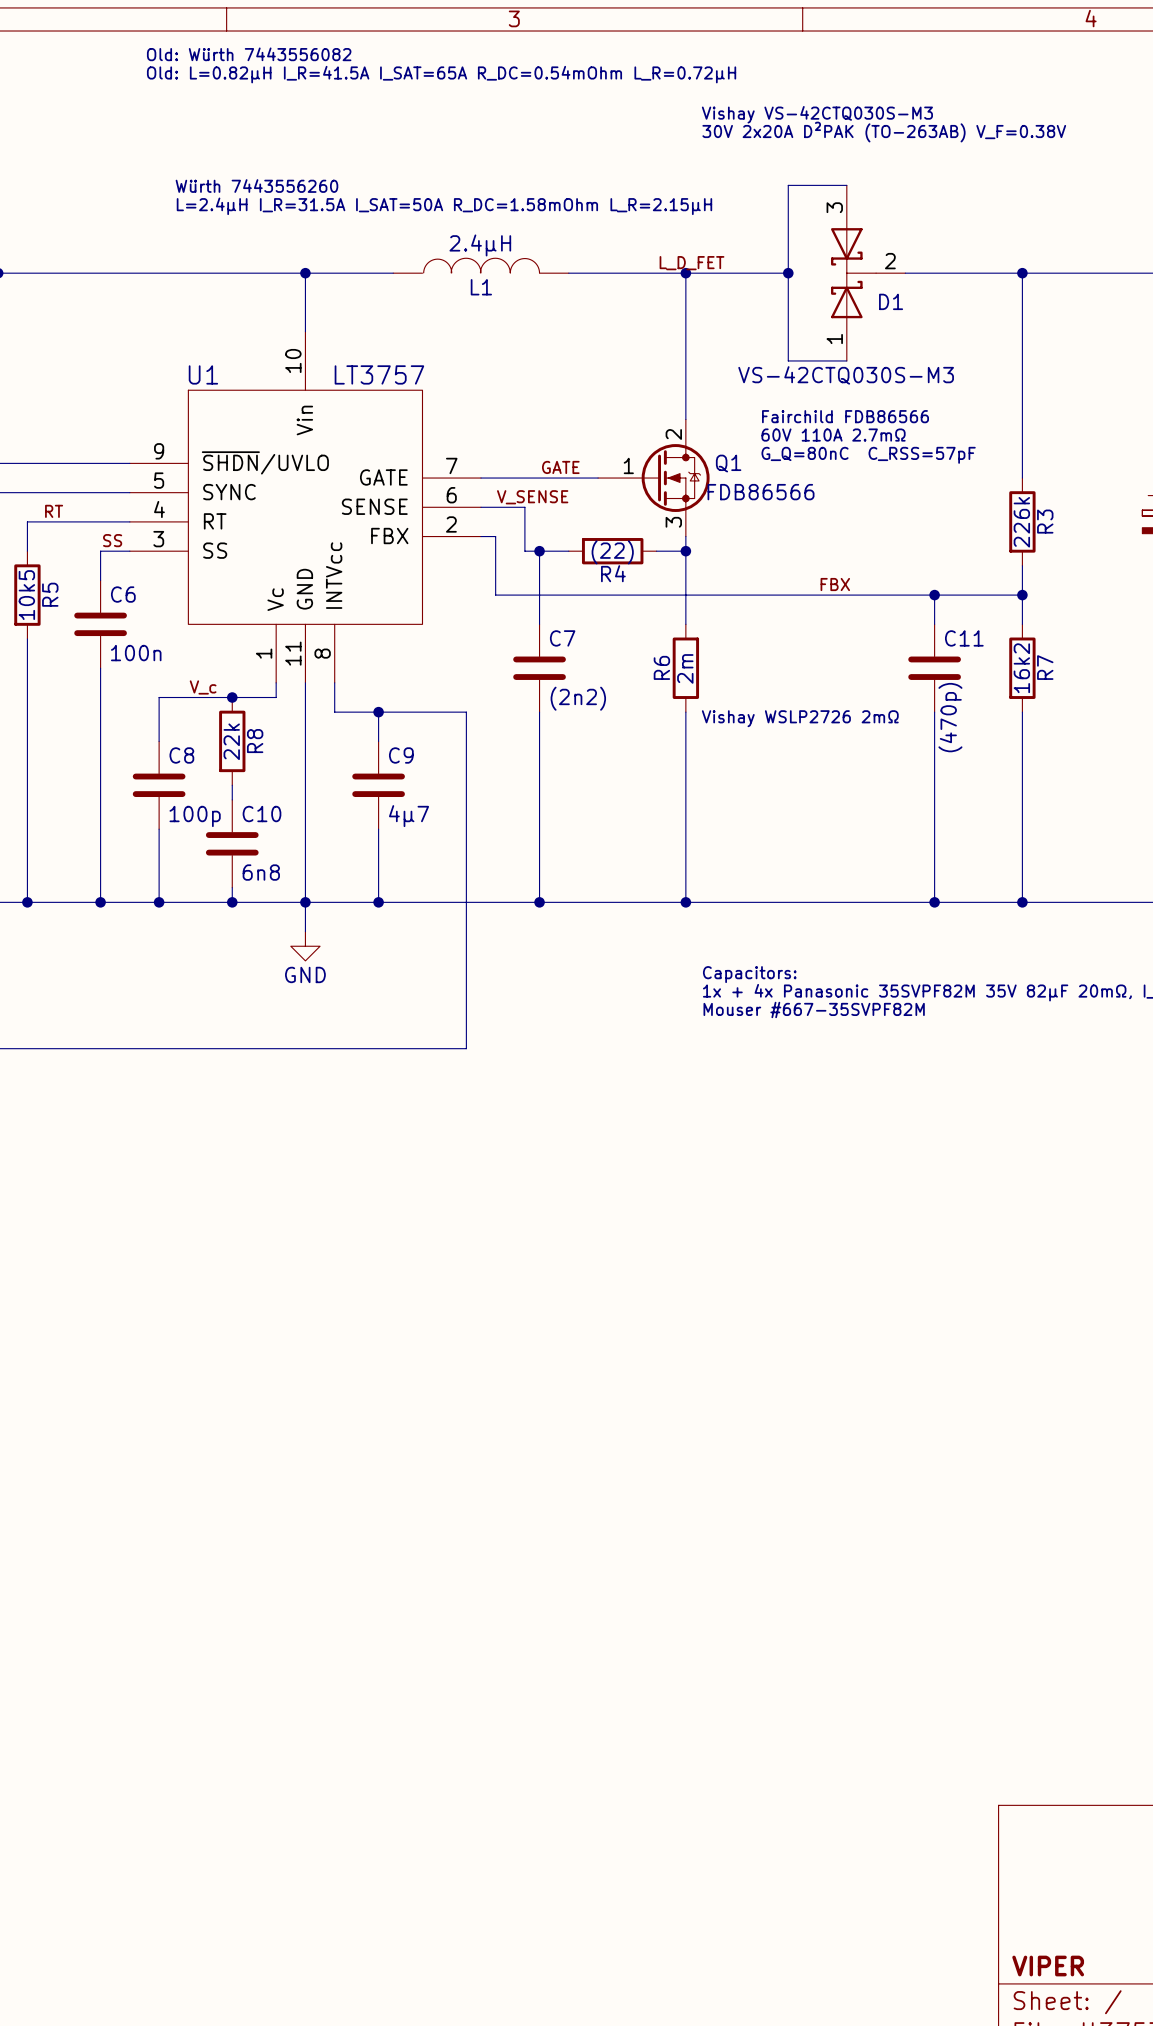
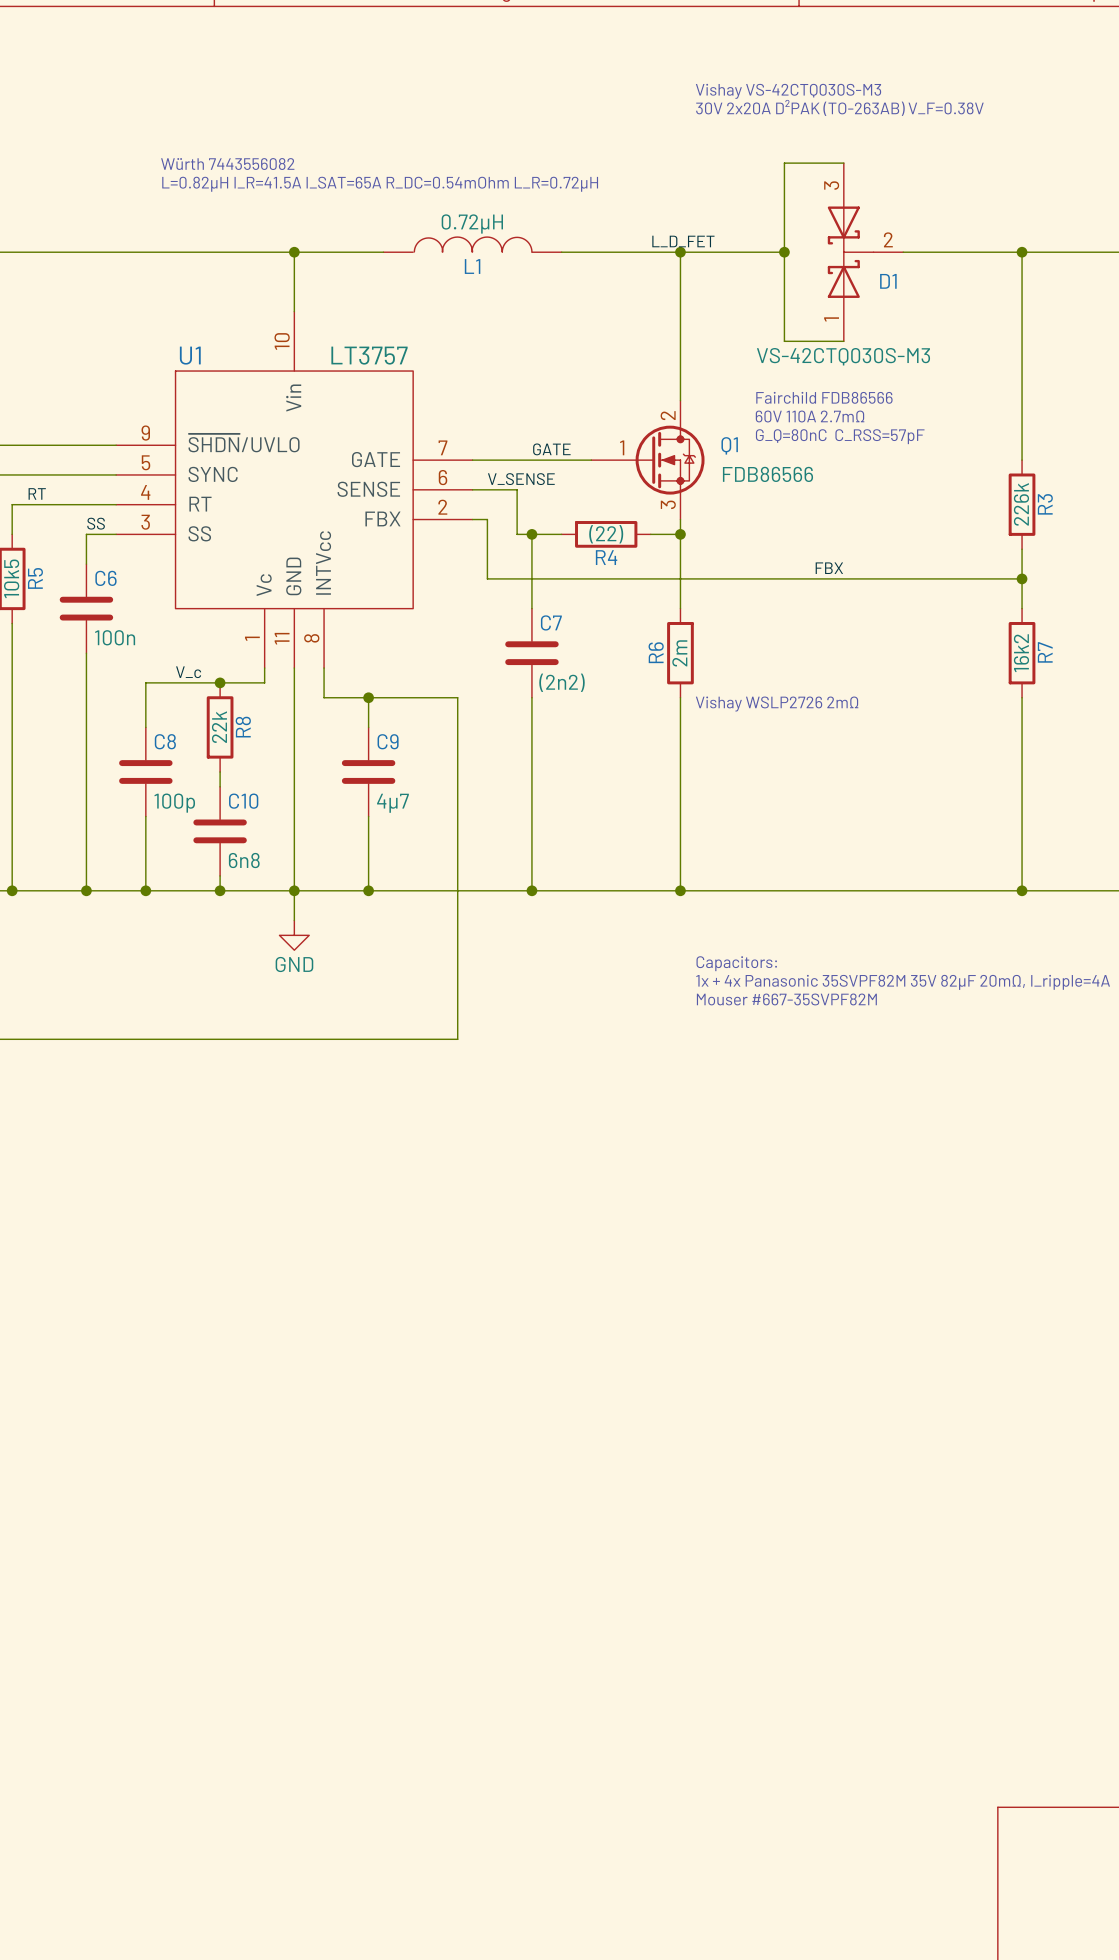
text: Old: Würth 7443556082 (249, 54) -> none
text: Old: L=0.82µH I_R=41.5A I_SAT=65A R_DC=0.54mOhm L_R=0.72µH (441, 74) -> none
text: Würth 7443556260 (256, 186) -> Würth 7443556082 (227, 164)
text: L=2.4µH I_R=31.5A I_SAT=50A R_DC=1.58mOhm L_R=2.15µH (444, 206) -> L=0.82µH I_R=41.5A I_SAT=65A R_DC=0.54mOhm L_R=0.72µH (380, 184)
L1 value: 2.4µH (480, 245) -> 0.72µH (472, 223)
wire: (934, 595) (934, 624) -> none
junction: (934, 595) -> none
C11: (470p) (934, 668) -> none
wire: (934, 712) (934, 902) -> none
junction: (934, 902) -> none

